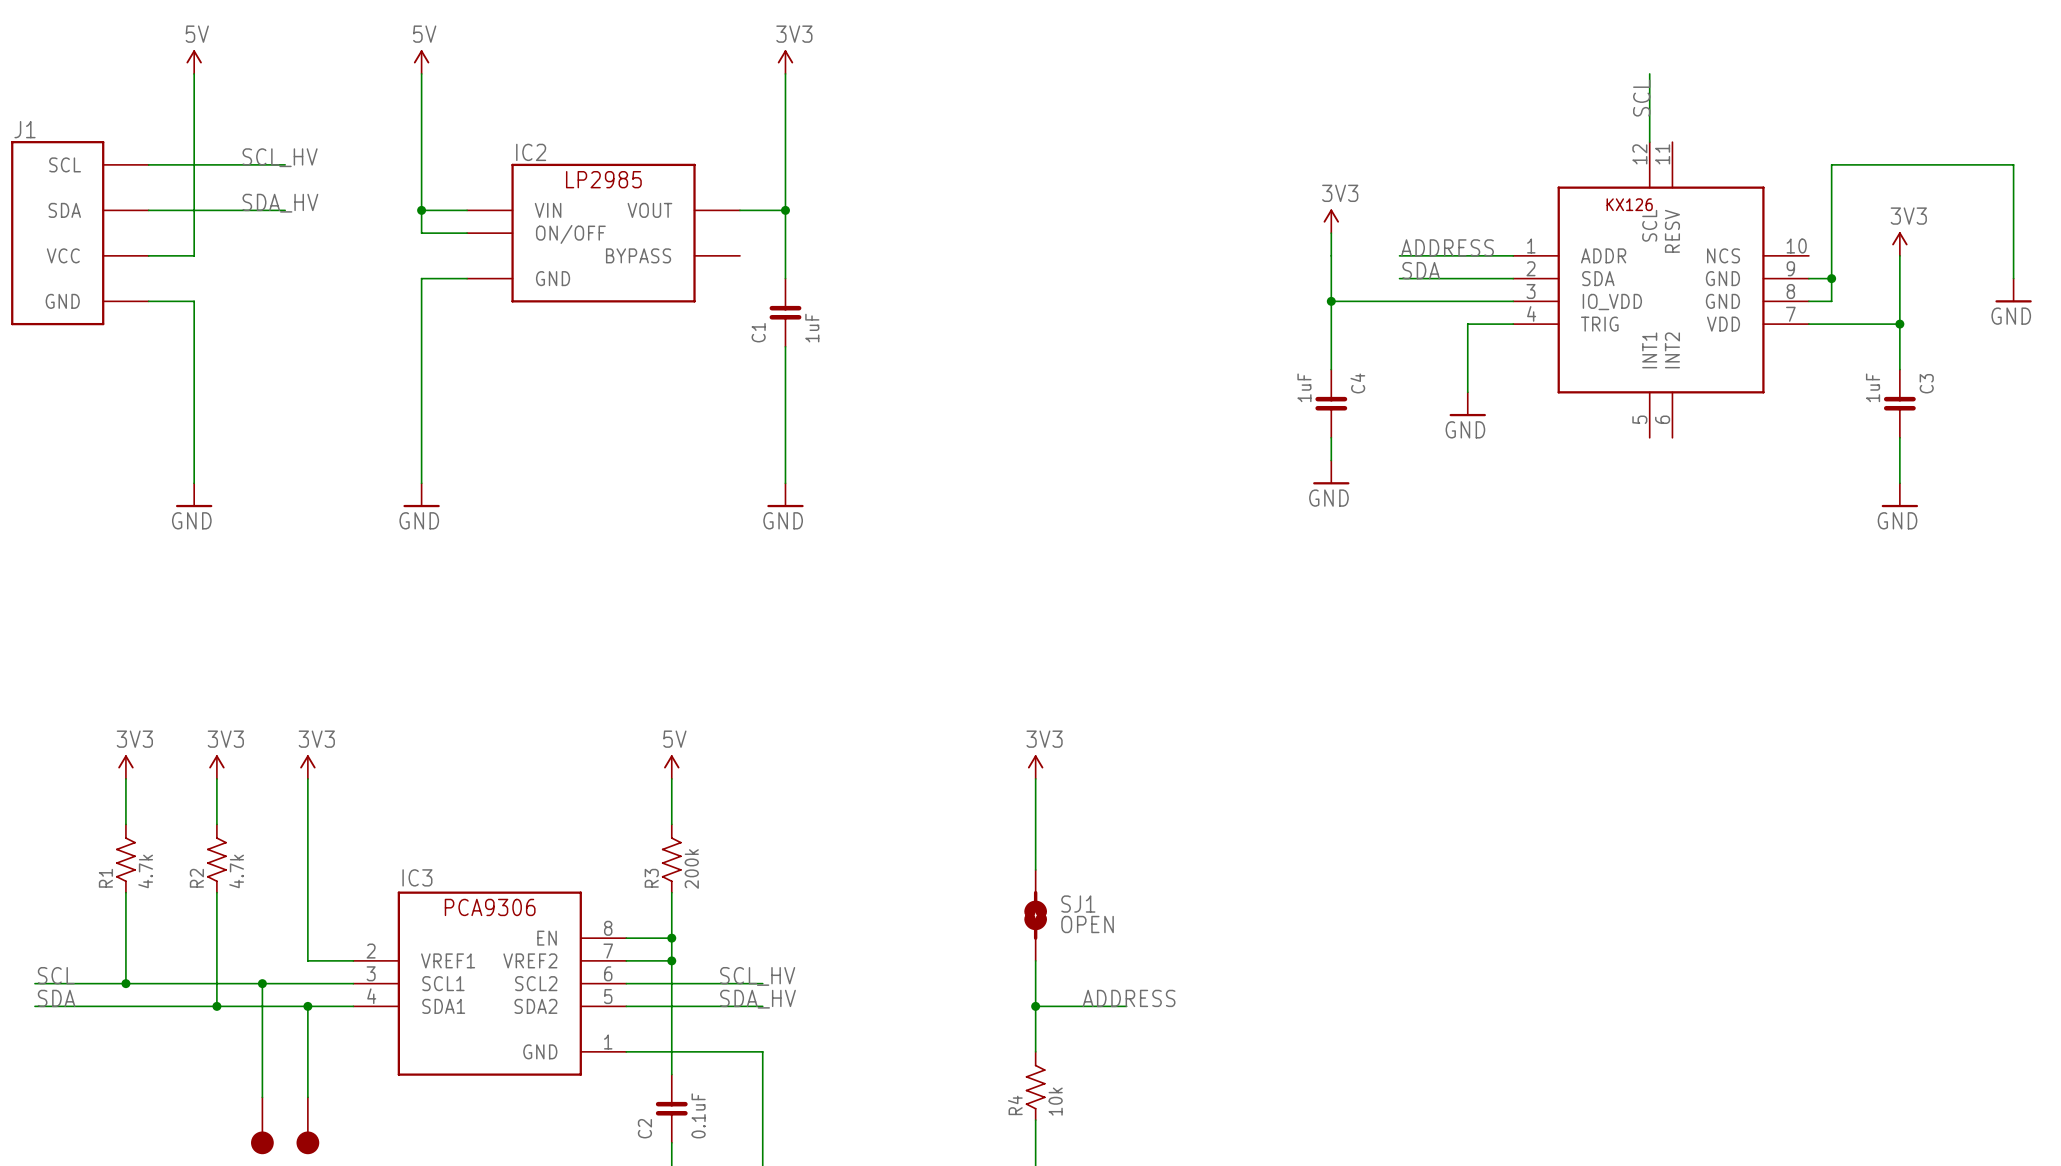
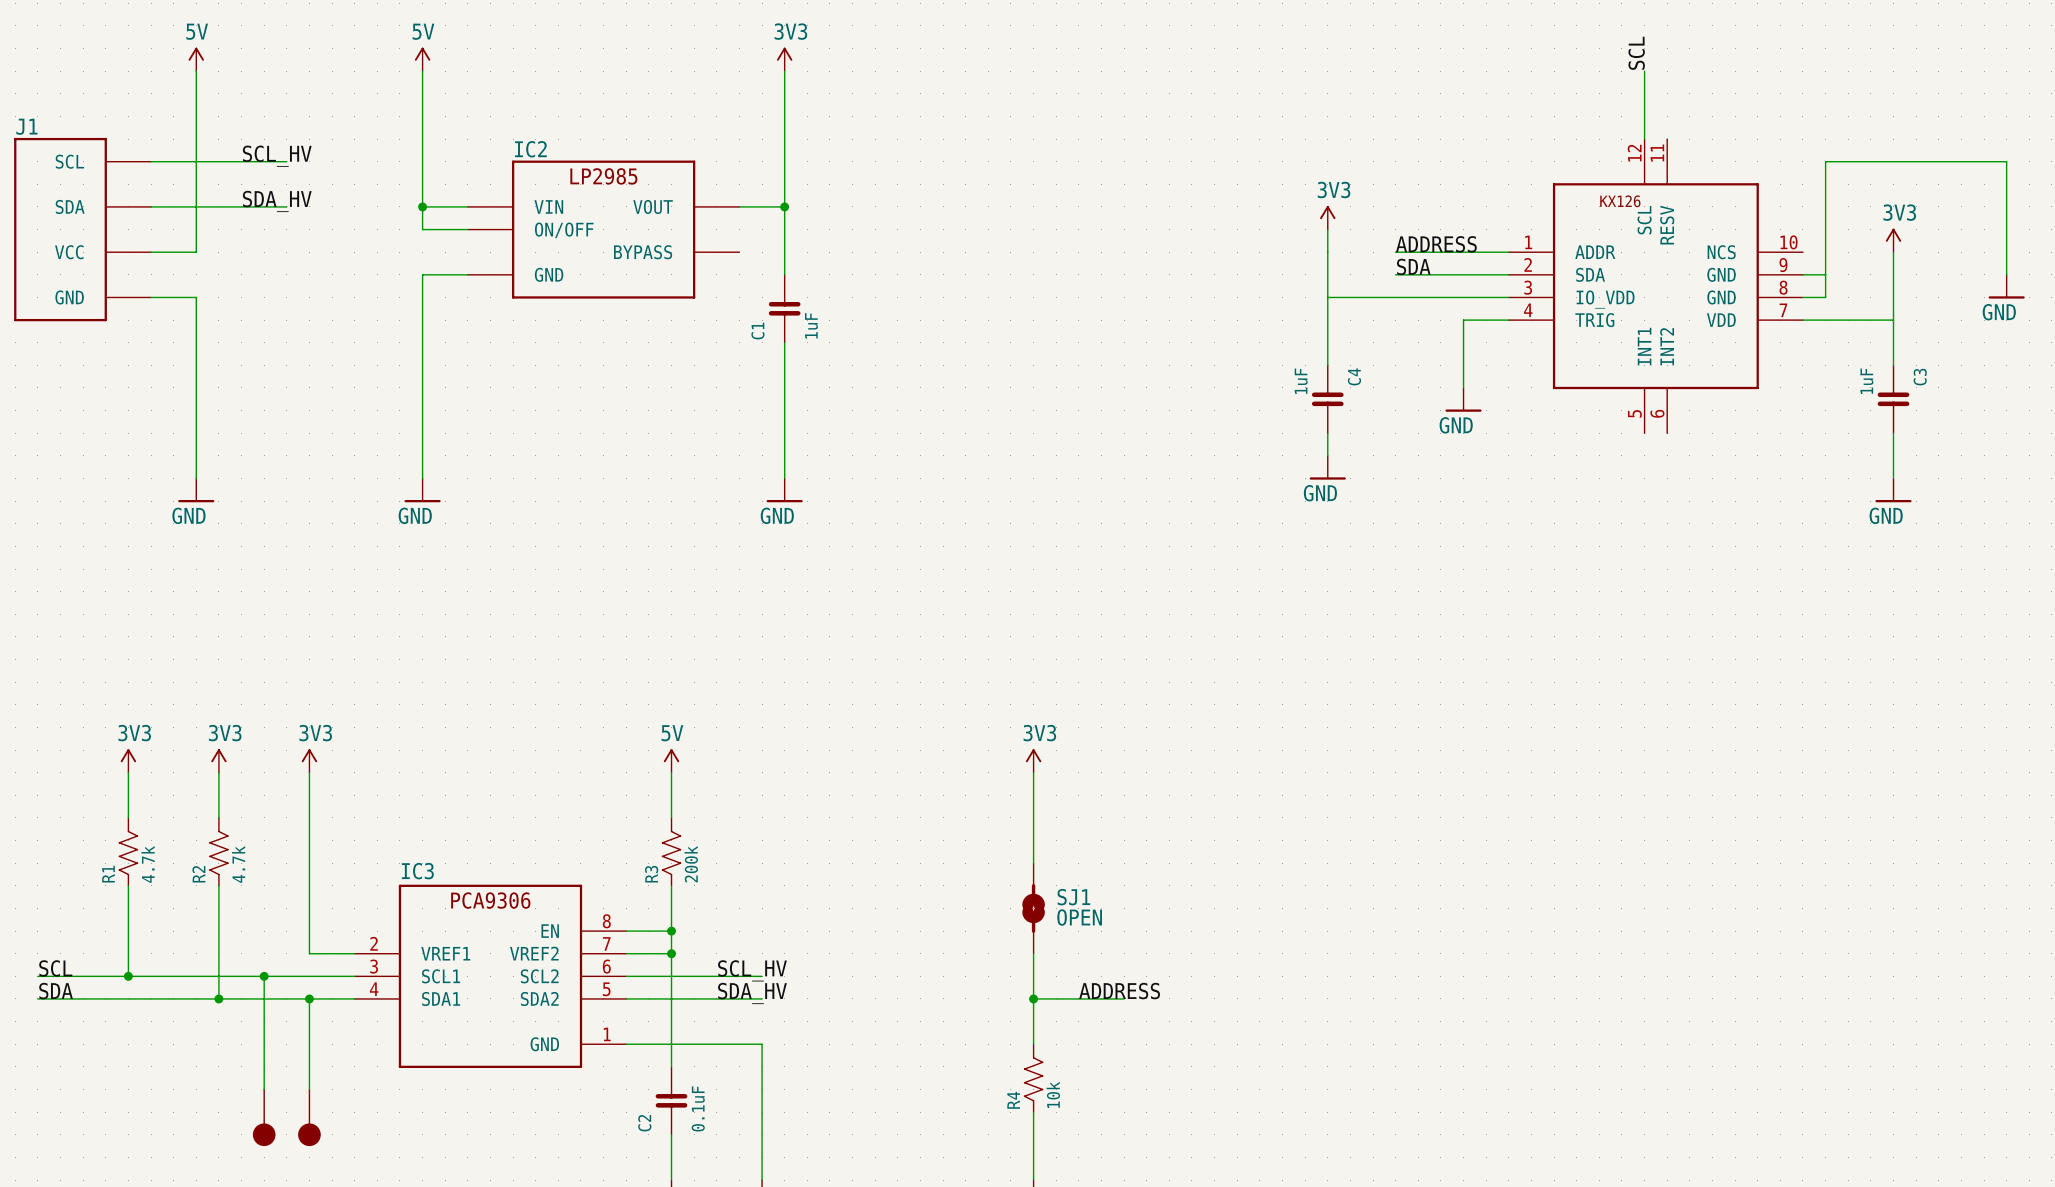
label position: SCL (1641, 98) -> SCL (1636, 53)
junction: (1831, 278) -> none
junction: (1331, 301) -> none
junction: (1899, 324) -> none

